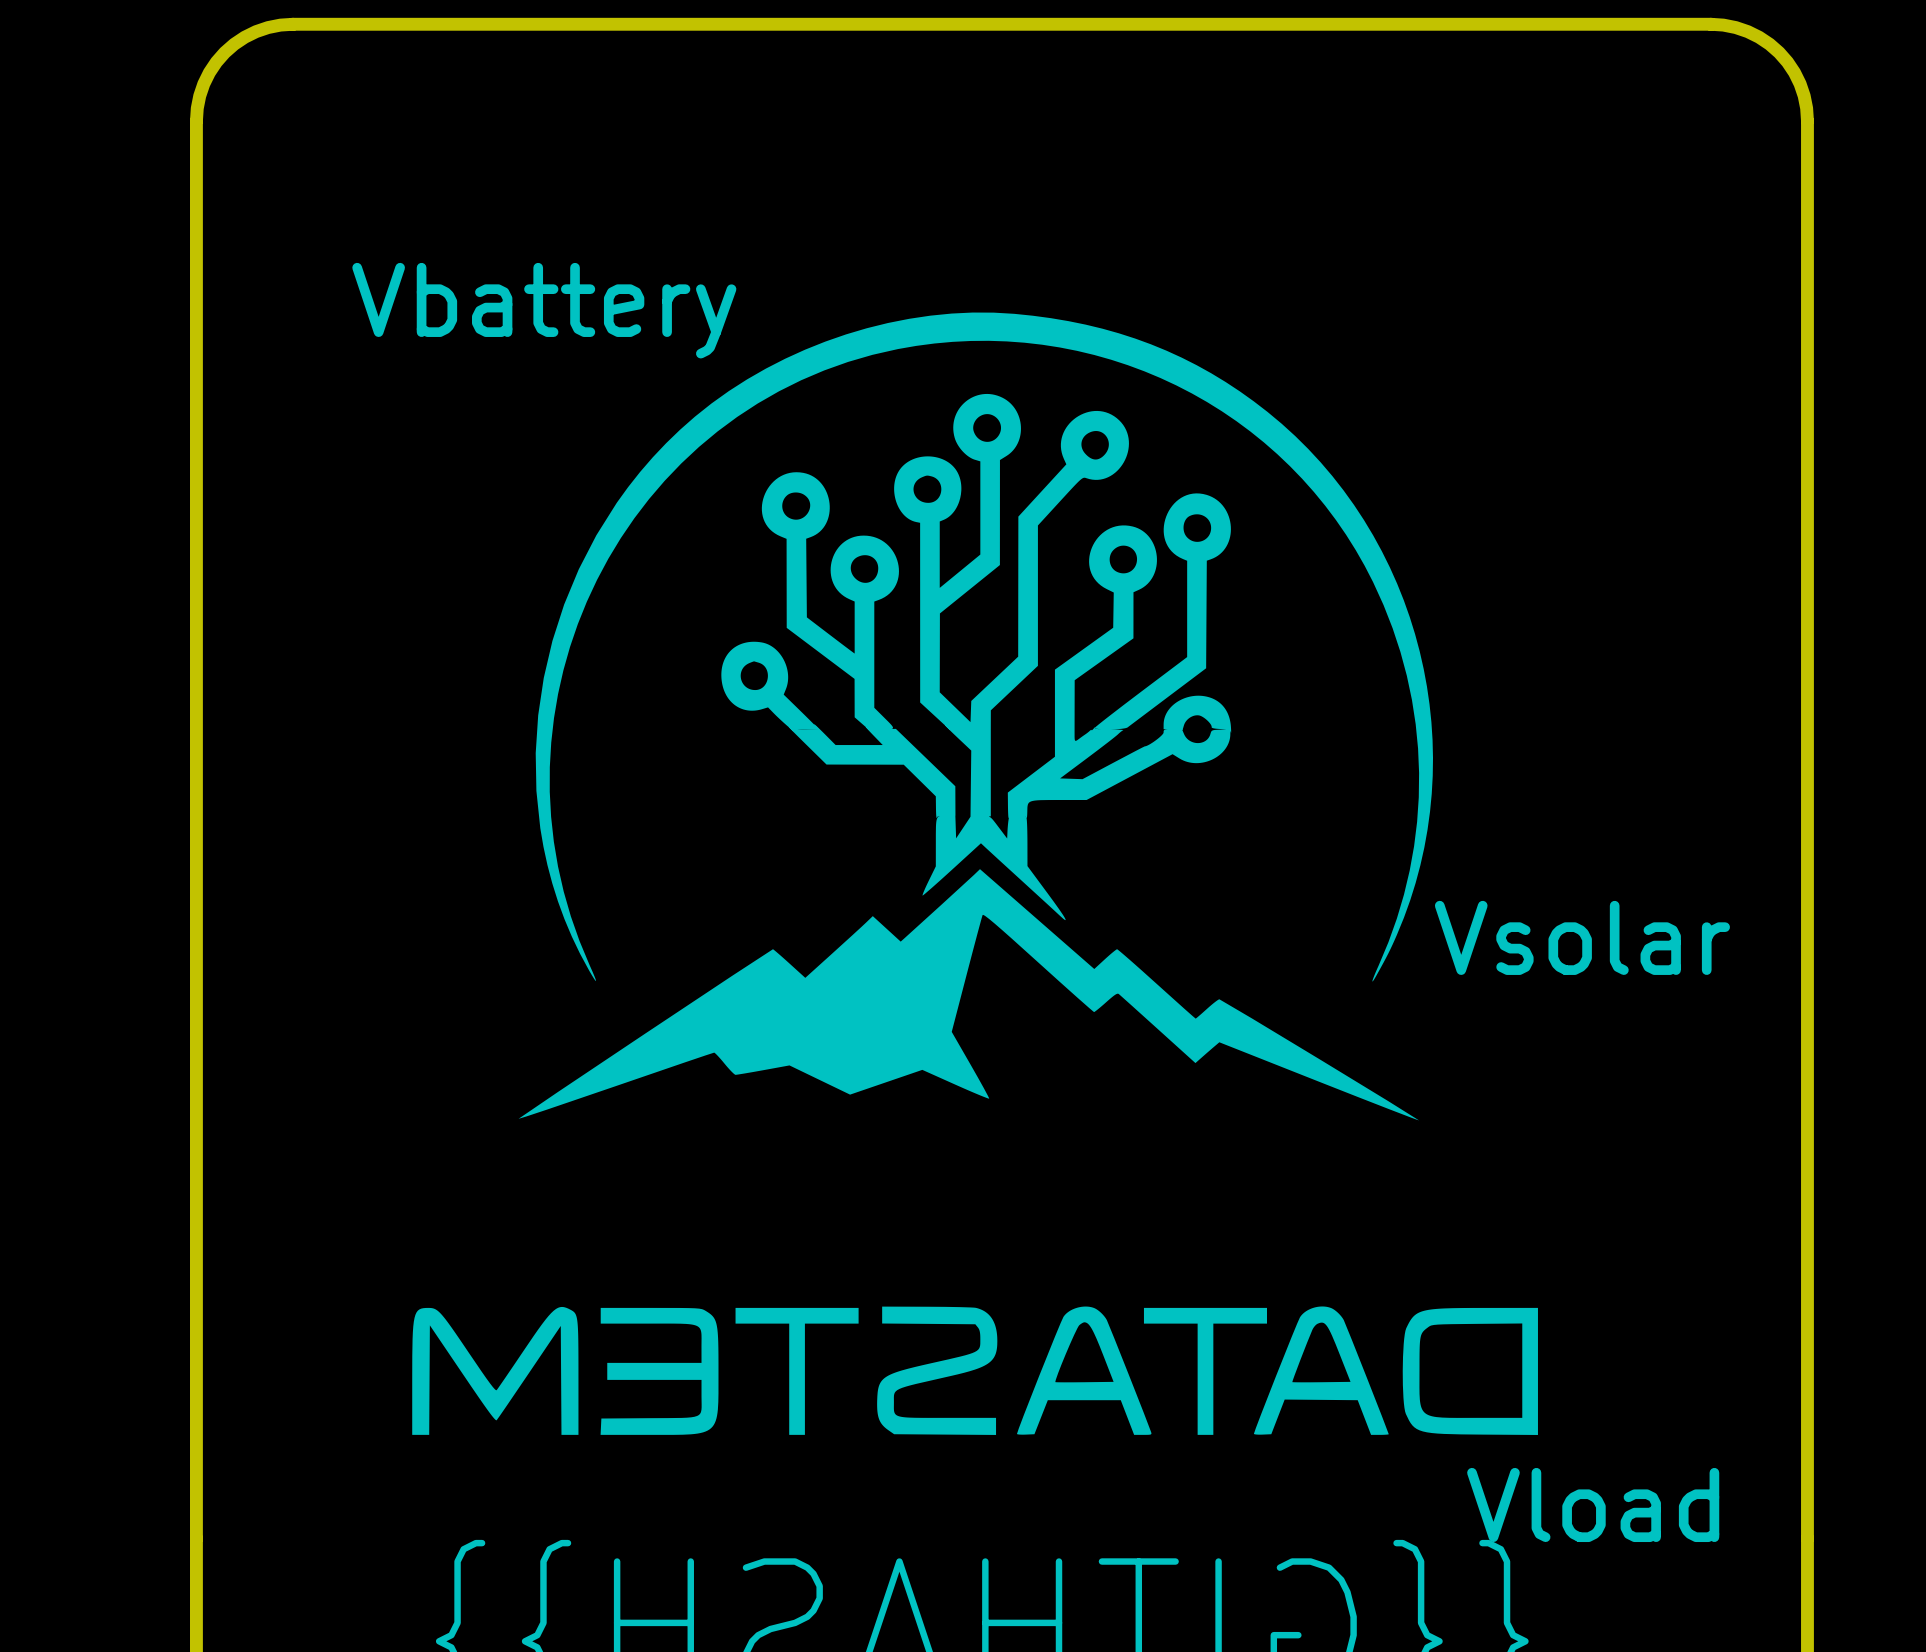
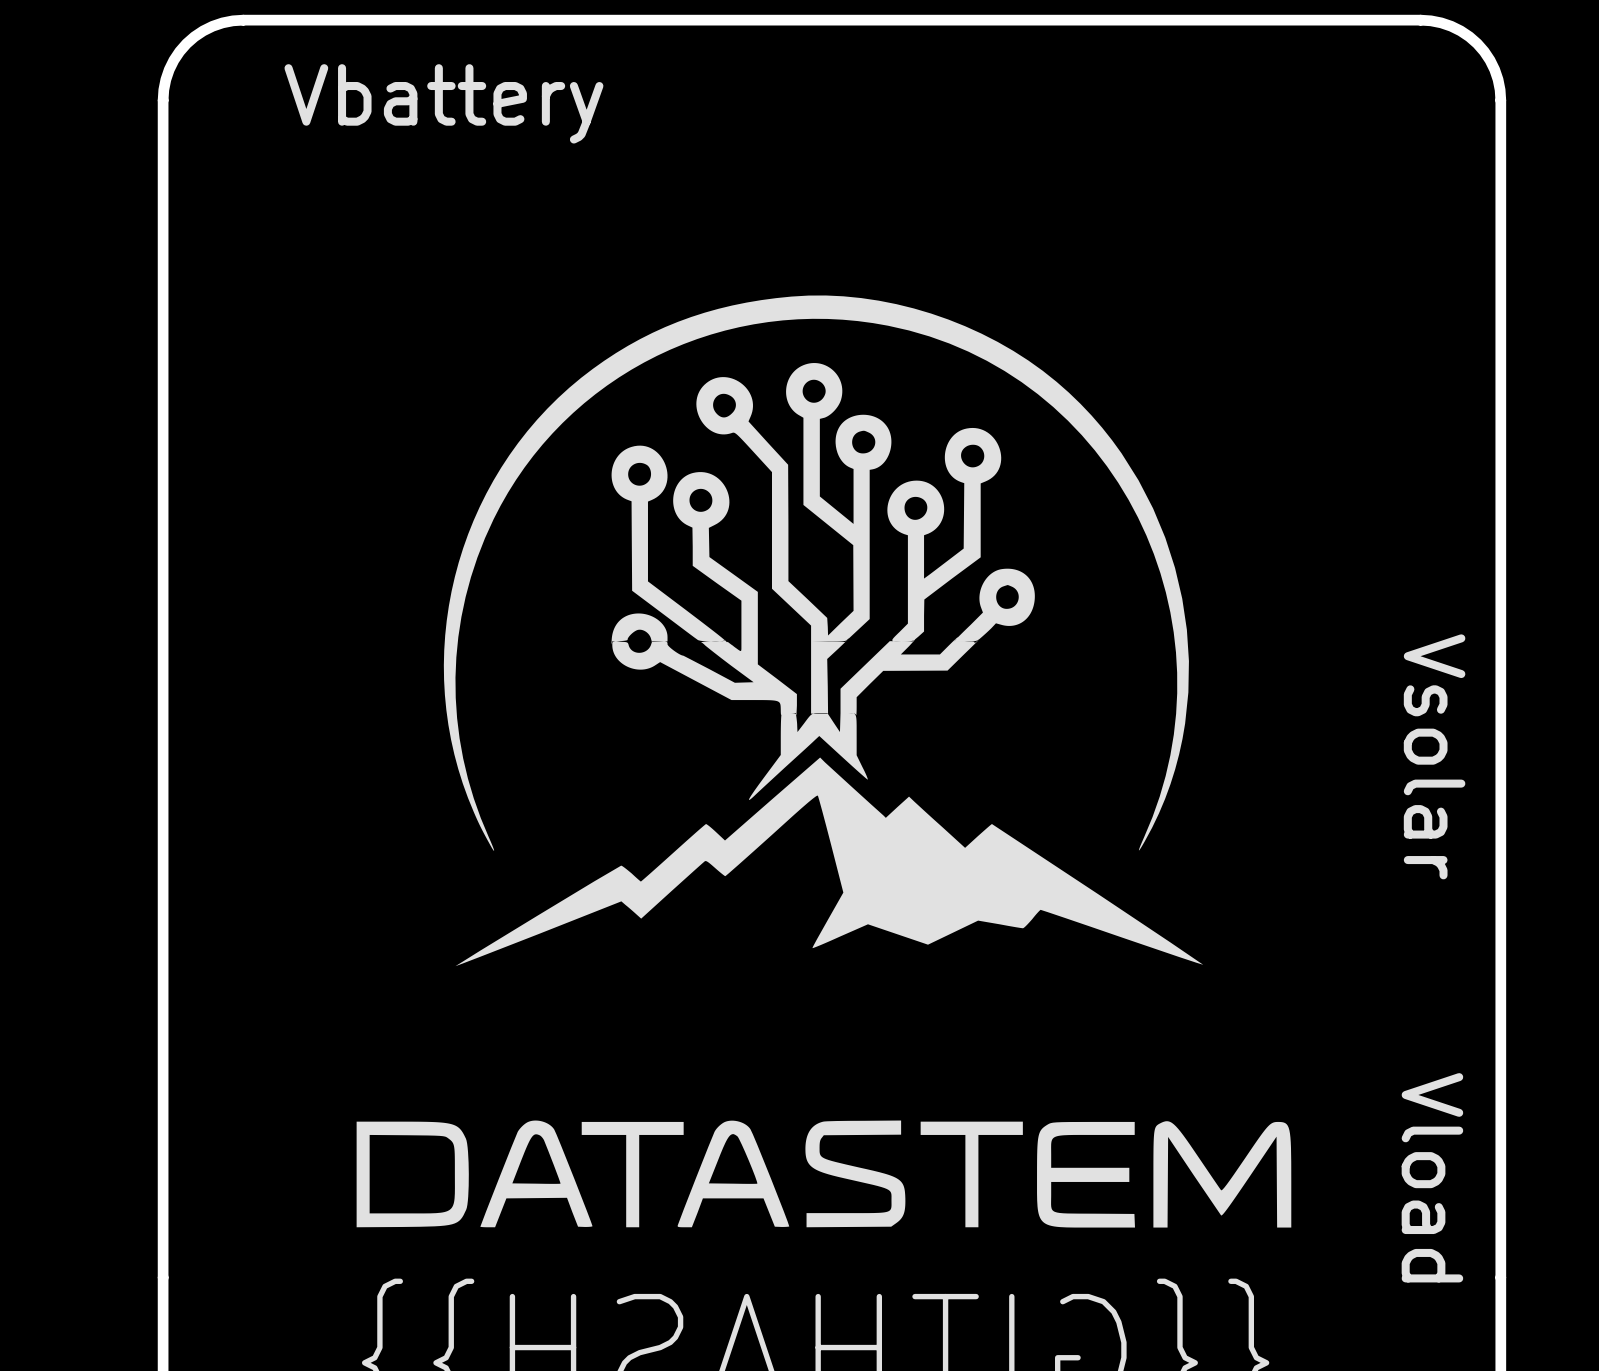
text position: Vbattery (544, 310) -> Vbattery (443, 103)
drawing: [535, 312, 1434, 982] -> none
drawing: none -> [443, 295, 1189, 851]
drawing shape: [1163, 695, 1232, 733] -> [953, 568, 1035, 643]
drawing shape: [922, 815, 1066, 921] -> [749, 638, 868, 800]
drawing shape: [518, 869, 1420, 1121] -> [455, 757, 1204, 967]
text rotation: 0° (1582, 937) -> 90° clockwise (1434, 756)
drawing shape: [412, 1306, 579, 1435] -> [356, 1121, 469, 1228]
drawing: [877, 1306, 1152, 1435] -> none
drawing shape: [1253, 1306, 1389, 1435] -> [1037, 1121, 1135, 1228]
drawing shape: [600, 1307, 719, 1435] -> [480, 1120, 593, 1228]
drawing shape: [1402, 1307, 1538, 1435] -> [1153, 1121, 1292, 1228]
drawing: none -> [677, 1120, 906, 1228]
drawing position: (797, 1371) -> (632, 1174)
drawing position: (1205, 1371) -> (971, 1174)
text rotation: 0° (1593, 1504) -> 90° clockwise (1432, 1177)

